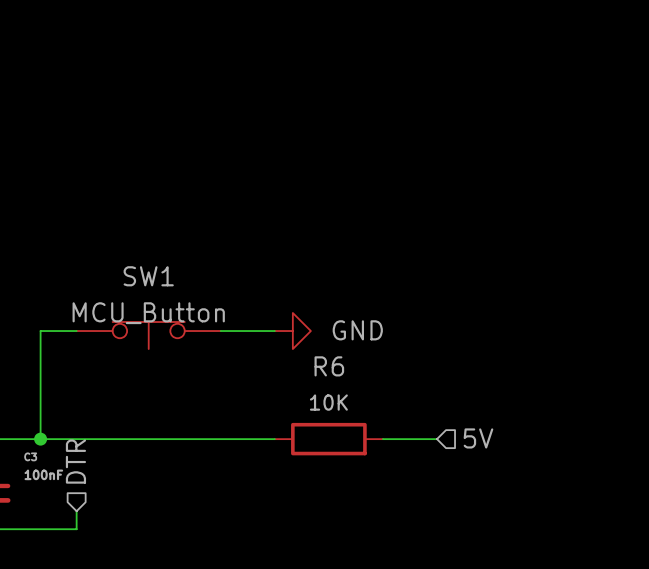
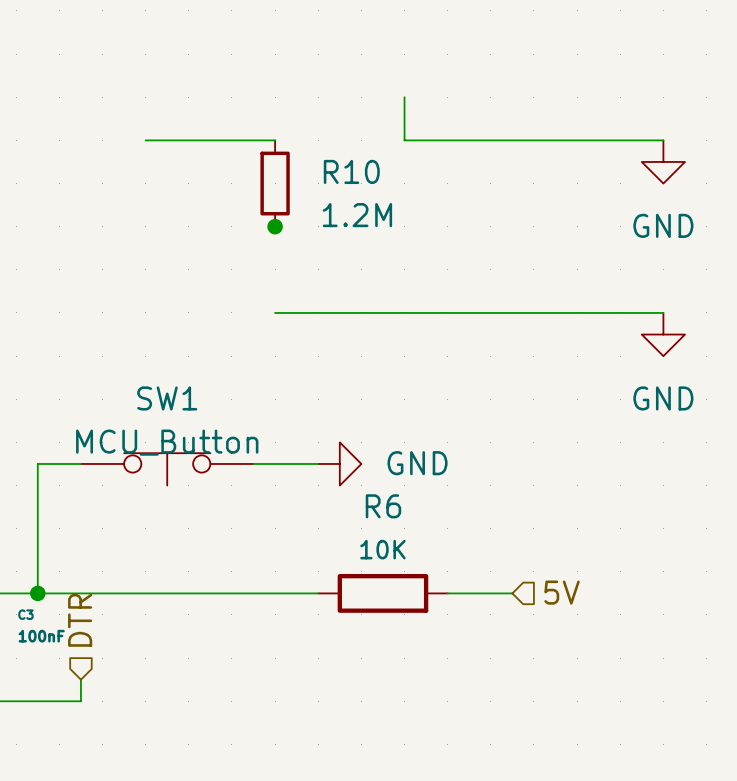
wire: none -> (404, 97) (404, 140) (663, 140)
wire: none -> (145, 140) (275, 140)
power symbol: none -> GND (663, 161)
R10: none -> 1.2M (275, 183)
junction: none -> (275, 226)
wire: none -> (275, 312) (663, 312)
power symbol: none -> GND (663, 334)

